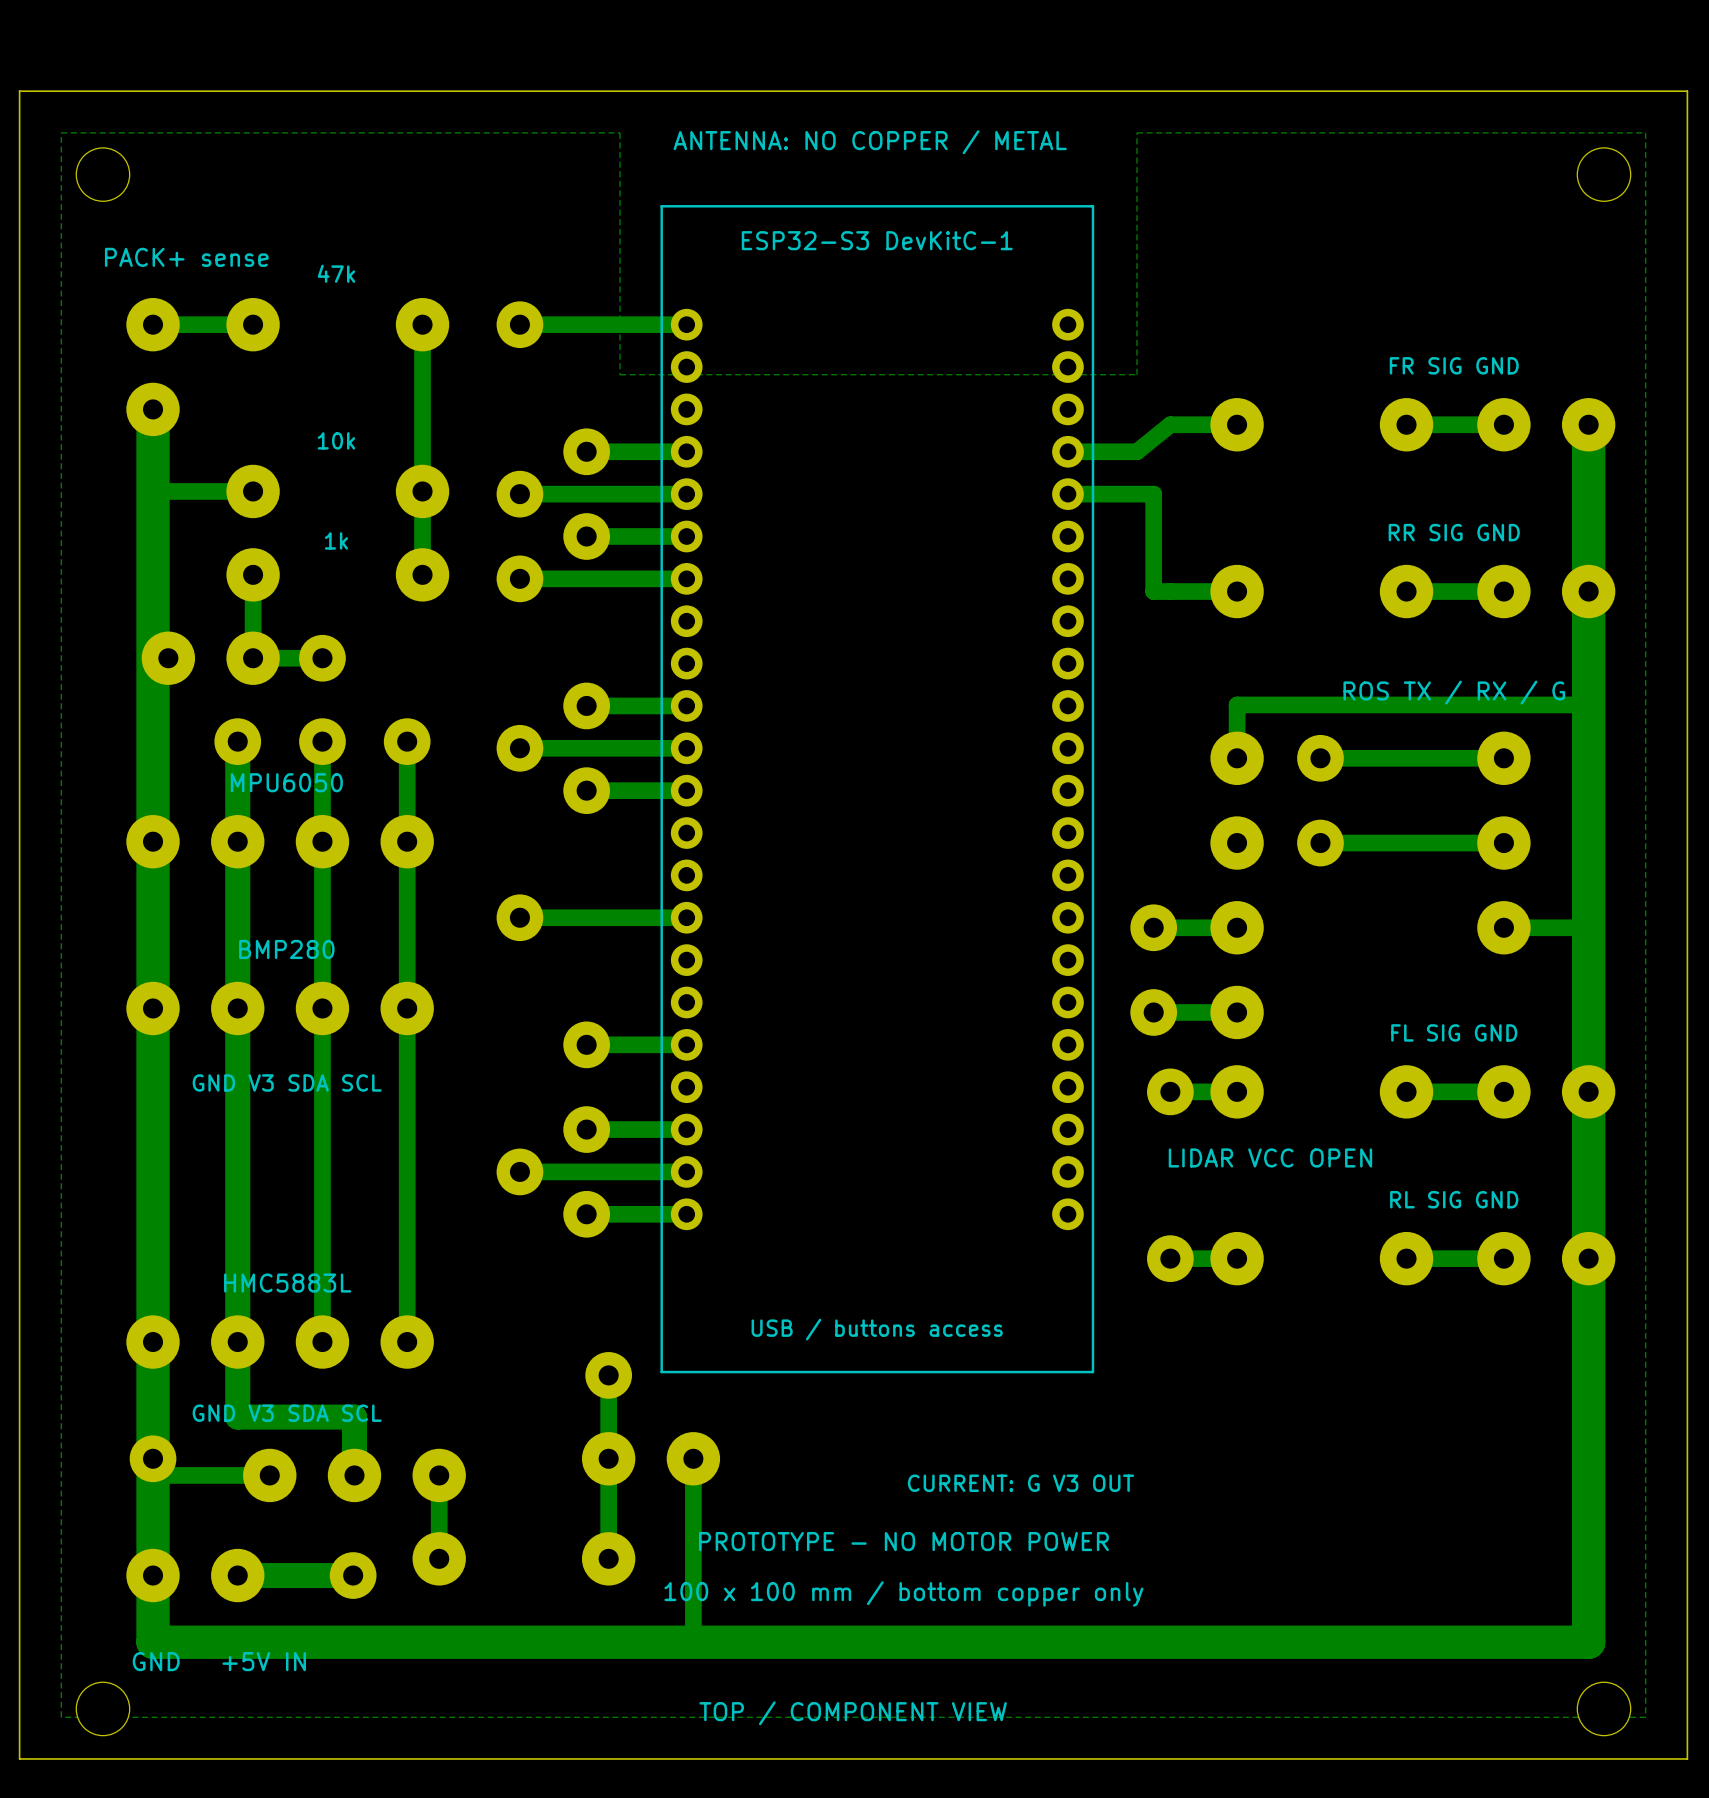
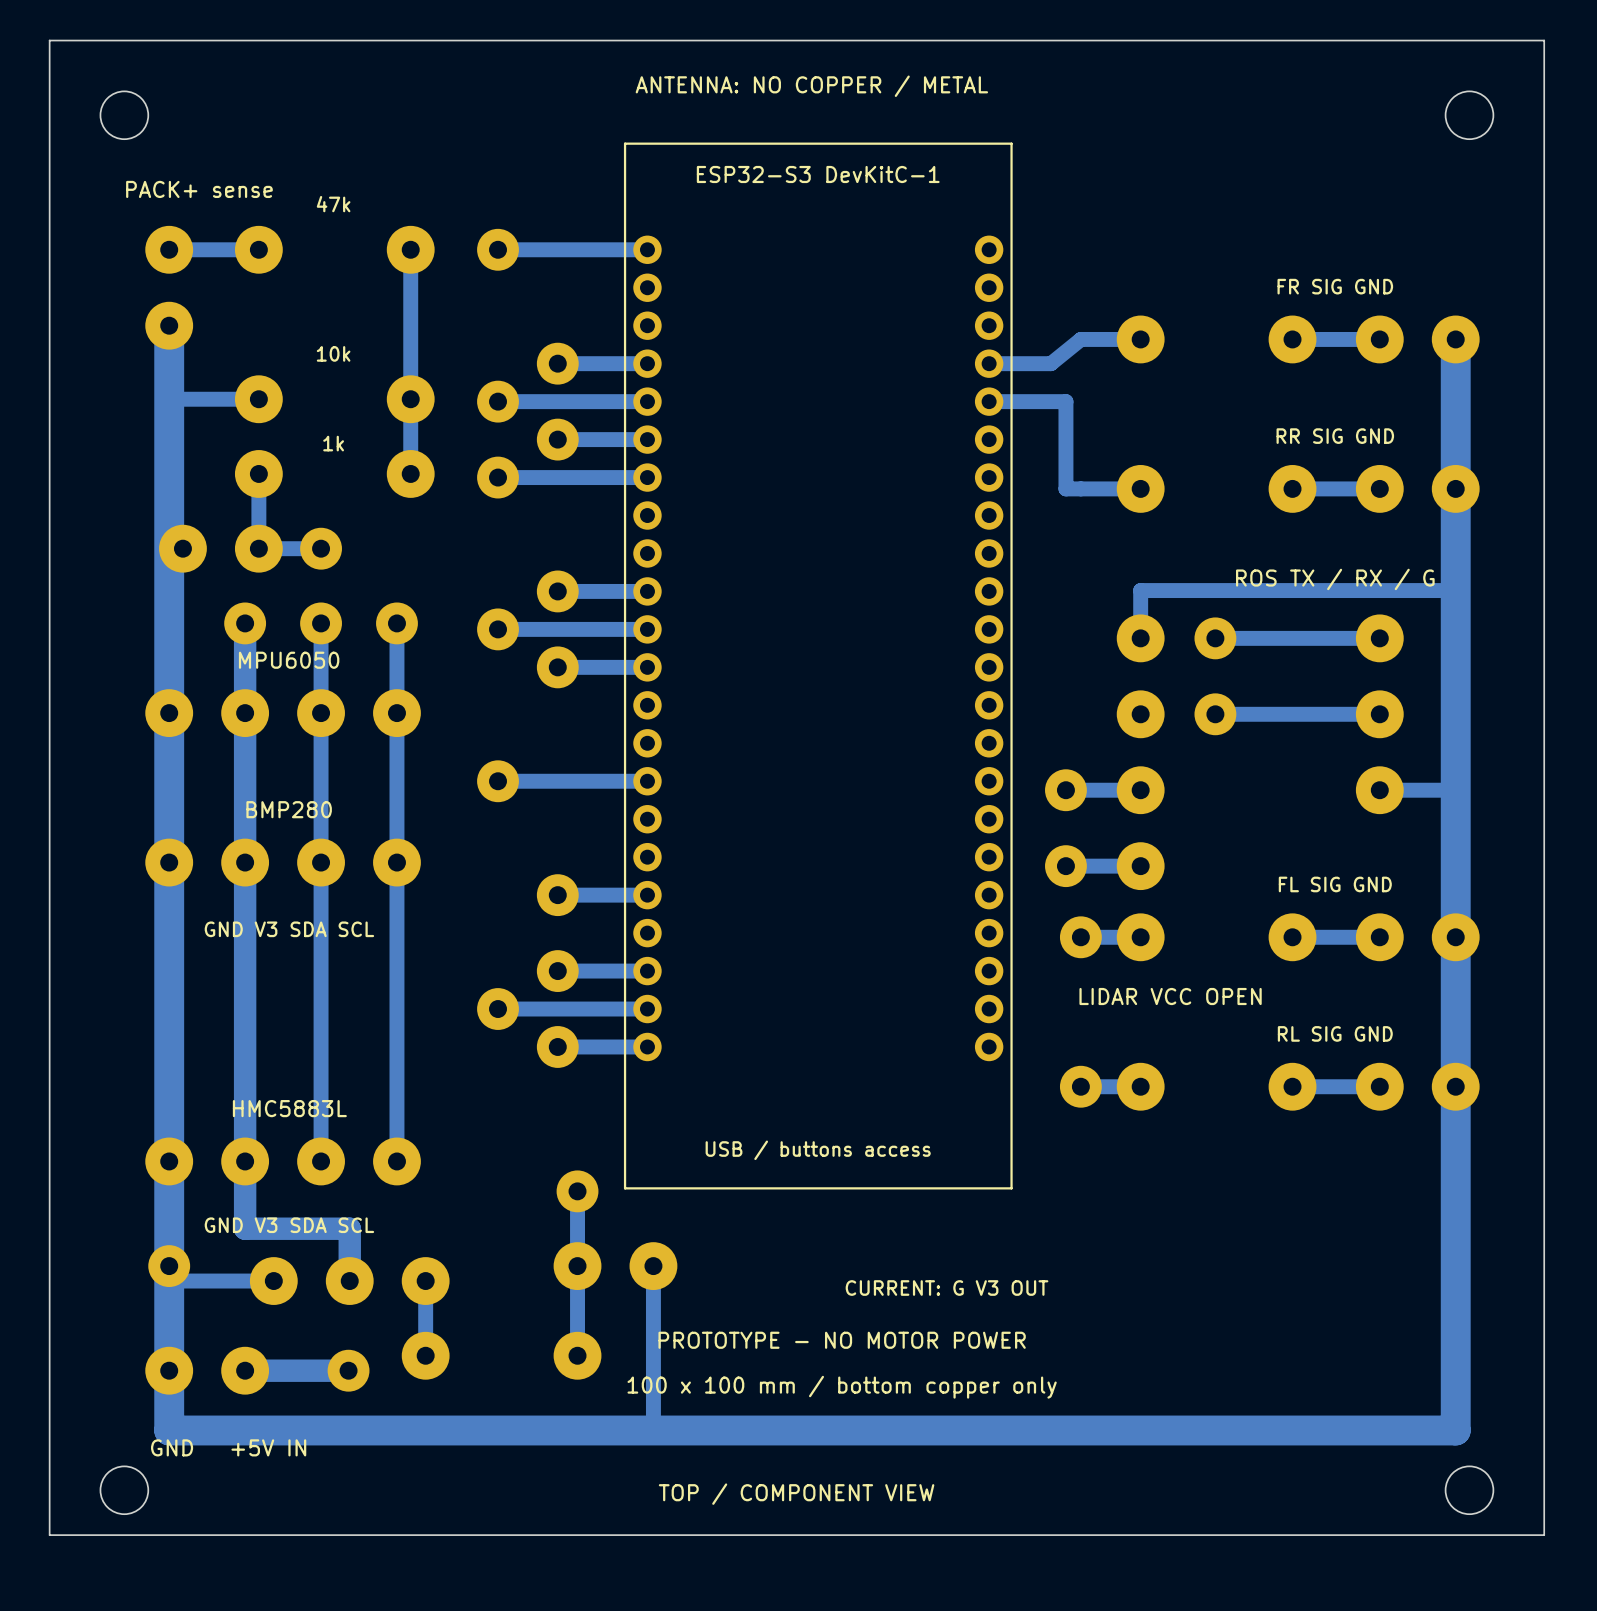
bottom zone outline: (61, 132) (620, 132) (620, 374) (1137, 374) (1137, 132) (1645, 132) (1645, 1717) (61, 1717) (61, 132) -> none

